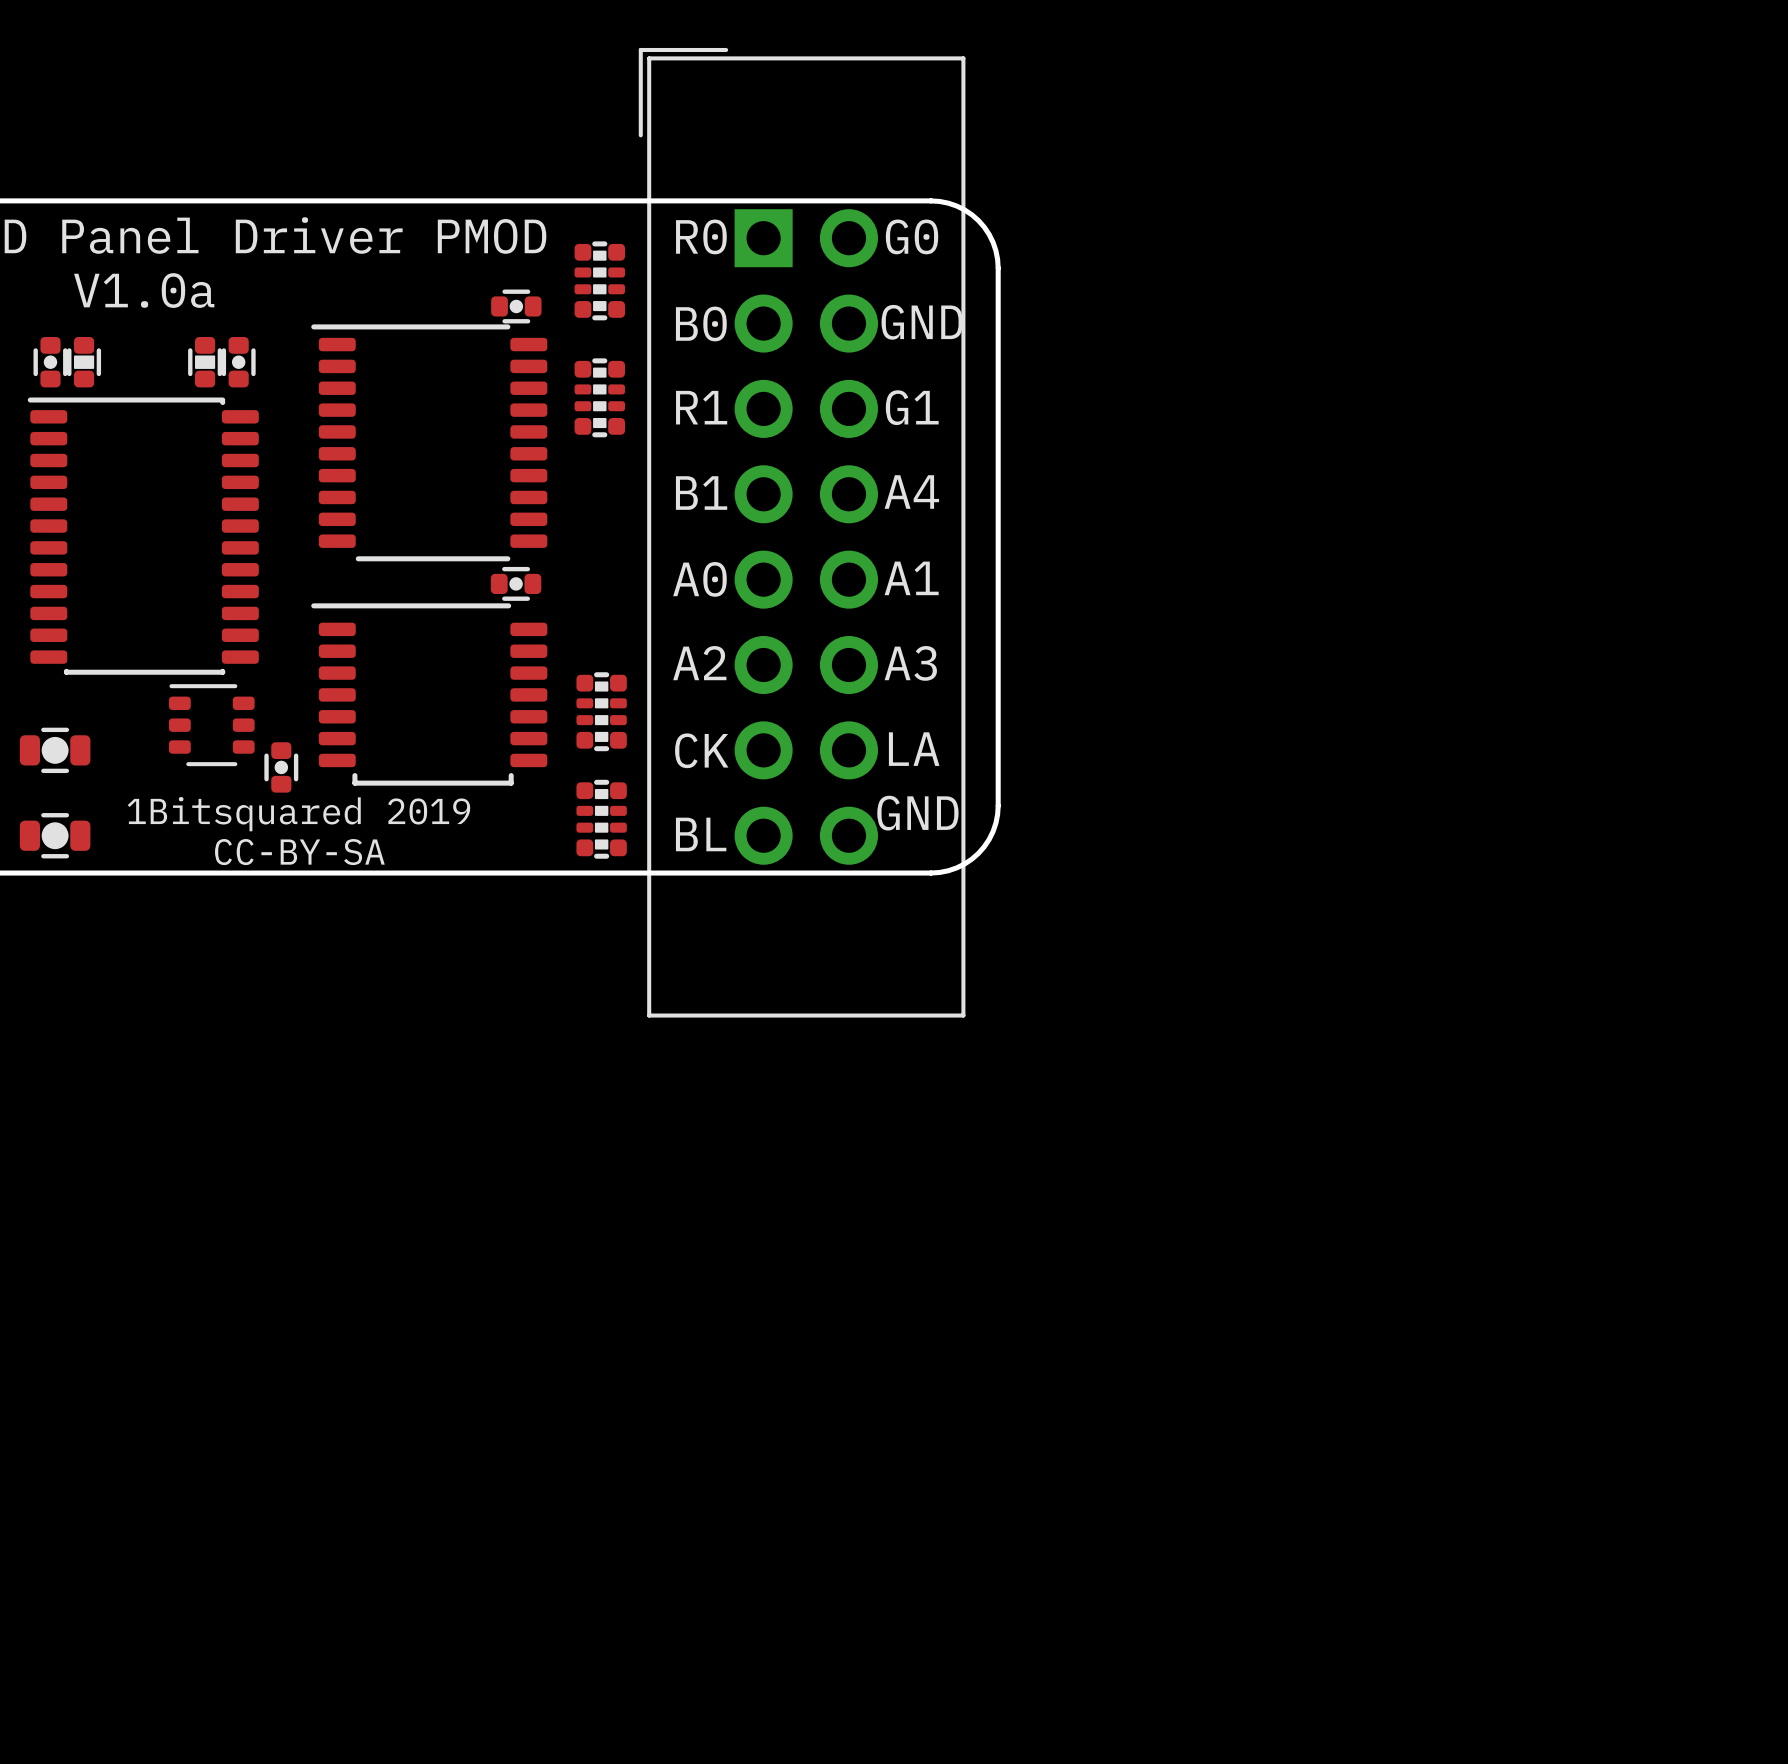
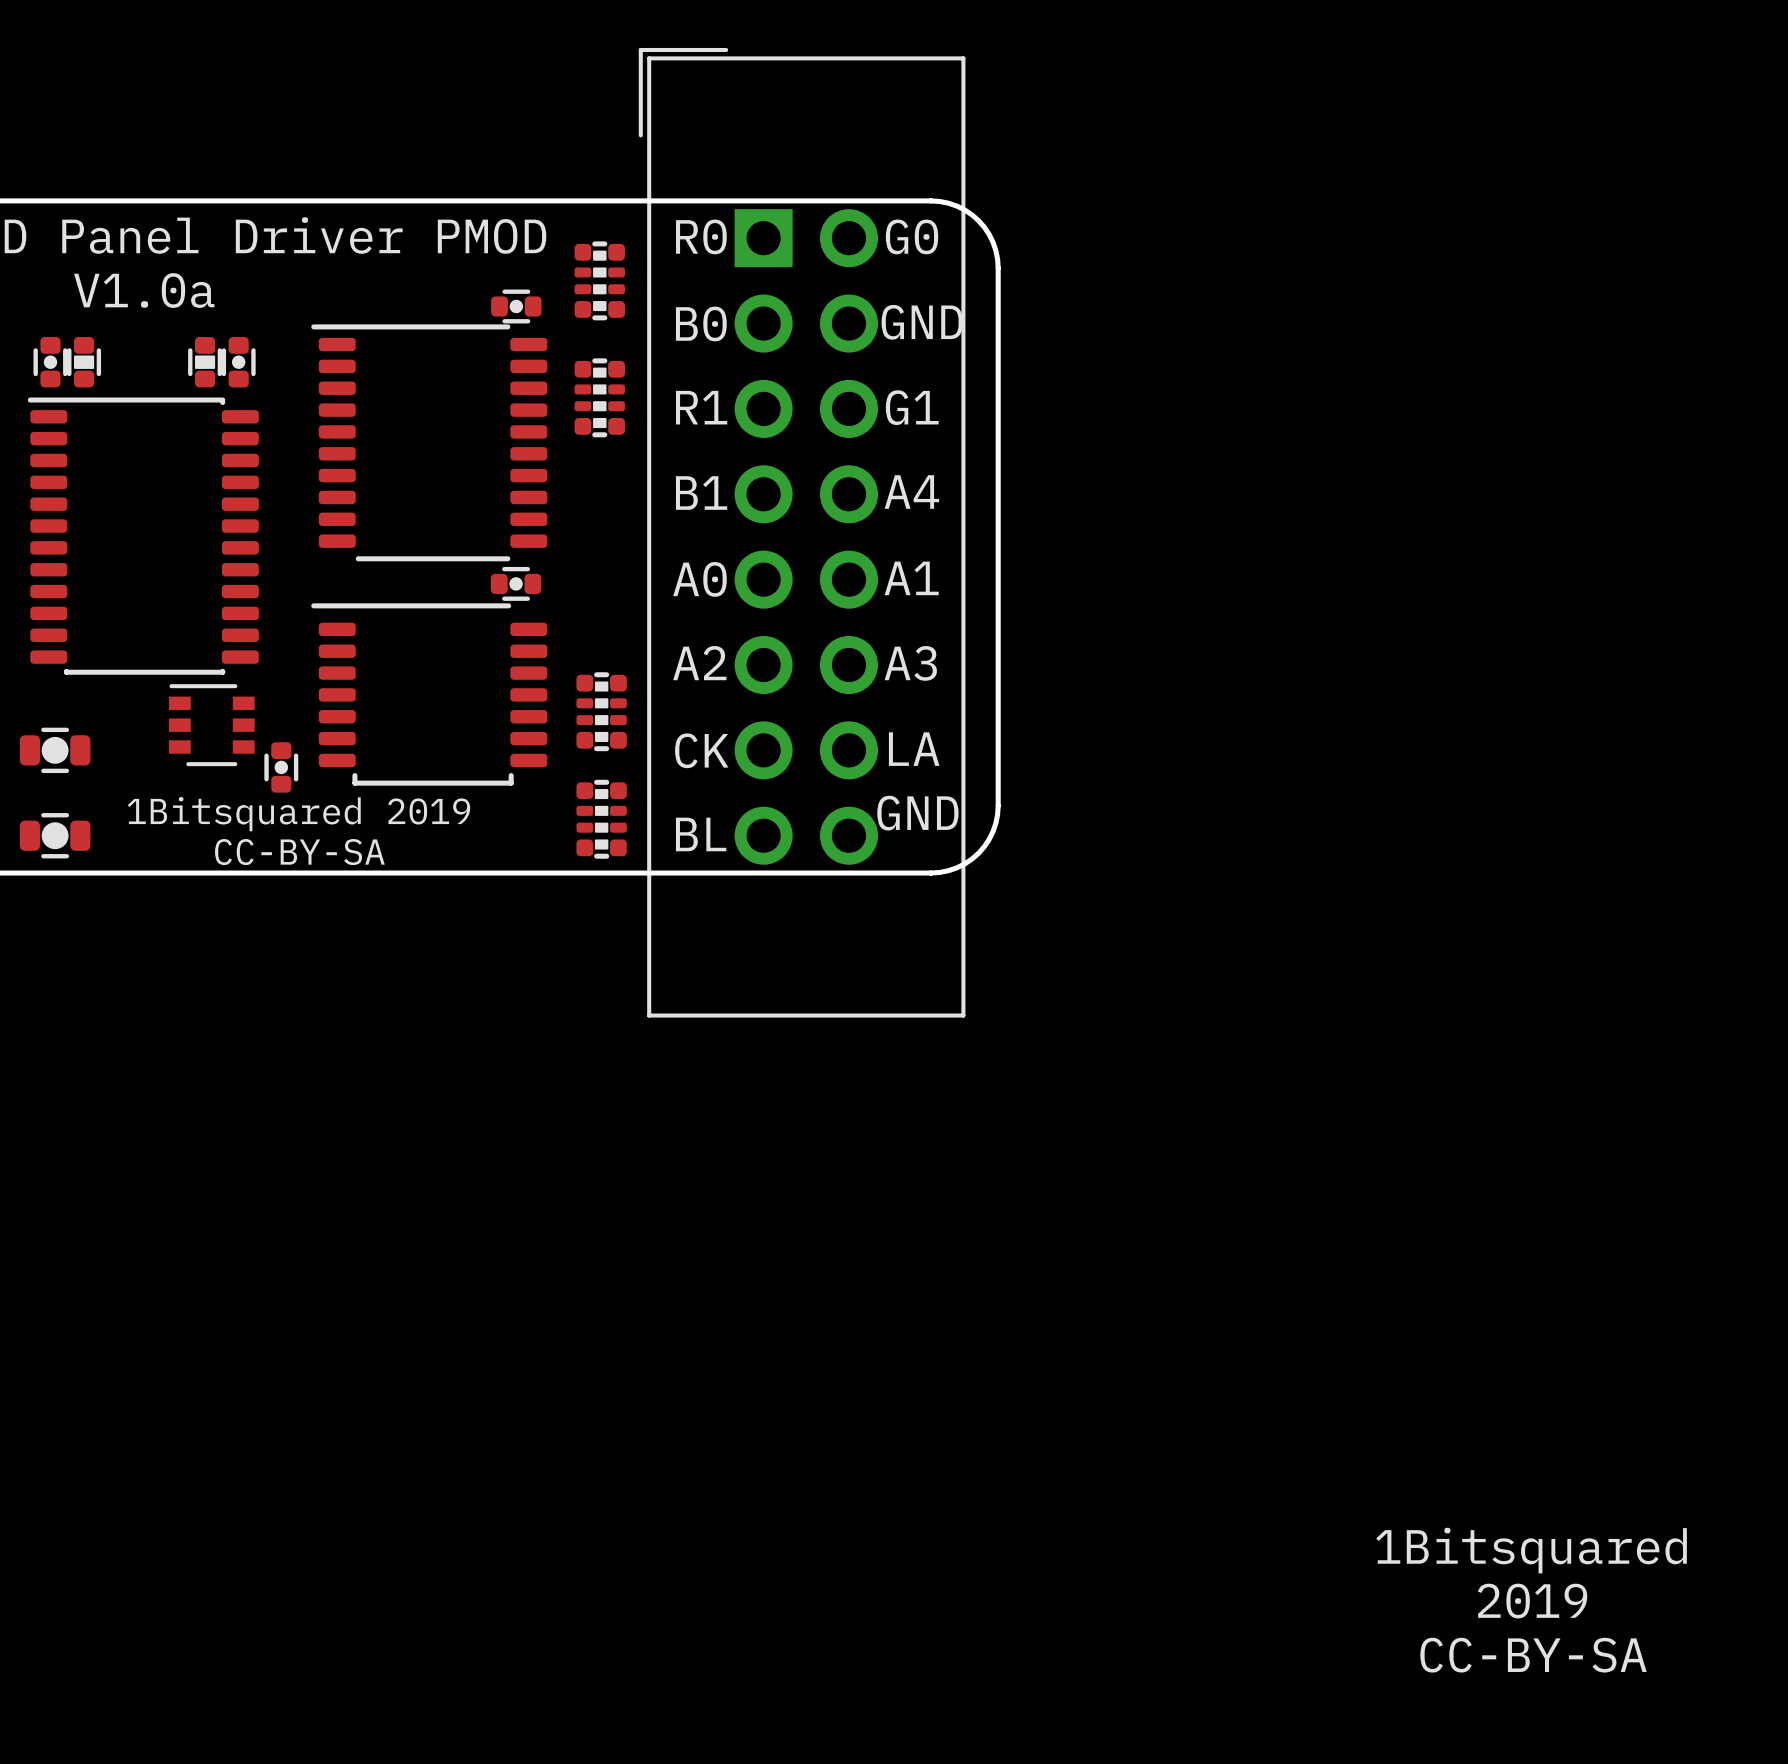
part footprint: [168, 684, 255, 767] -> [168, 684, 255, 767]
text: none -> 1Bitsquared (1531, 1550)
text: none -> 2019 (1532, 1601)
text: none -> CC-BY-SA (1533, 1655)

